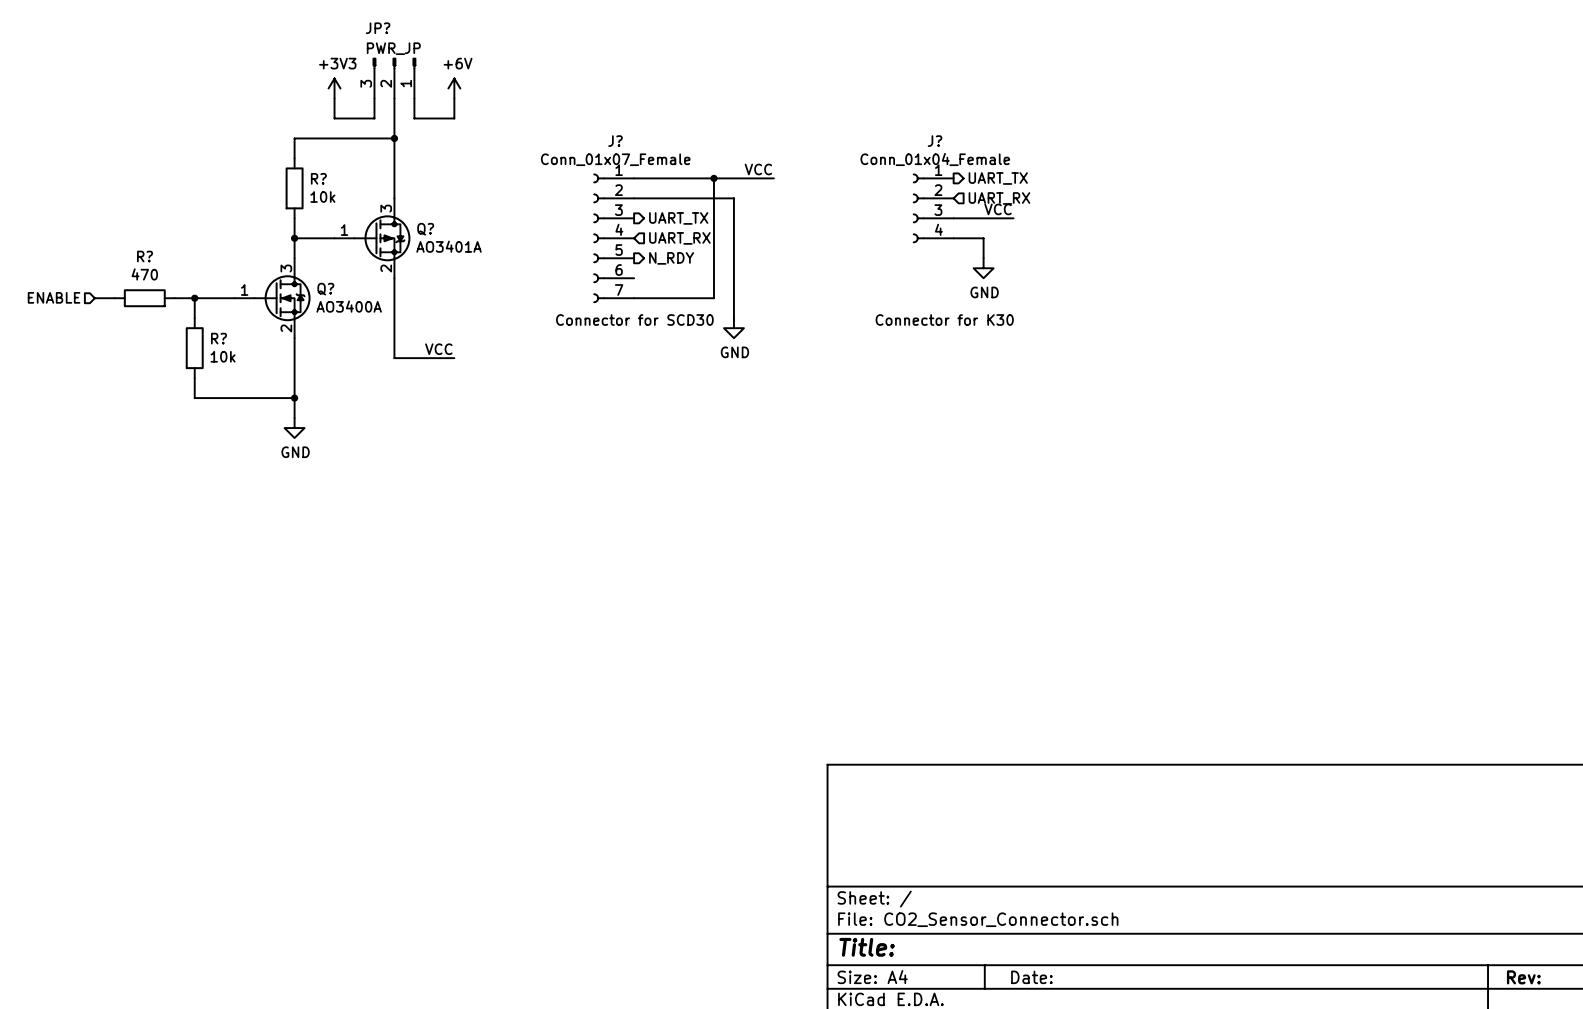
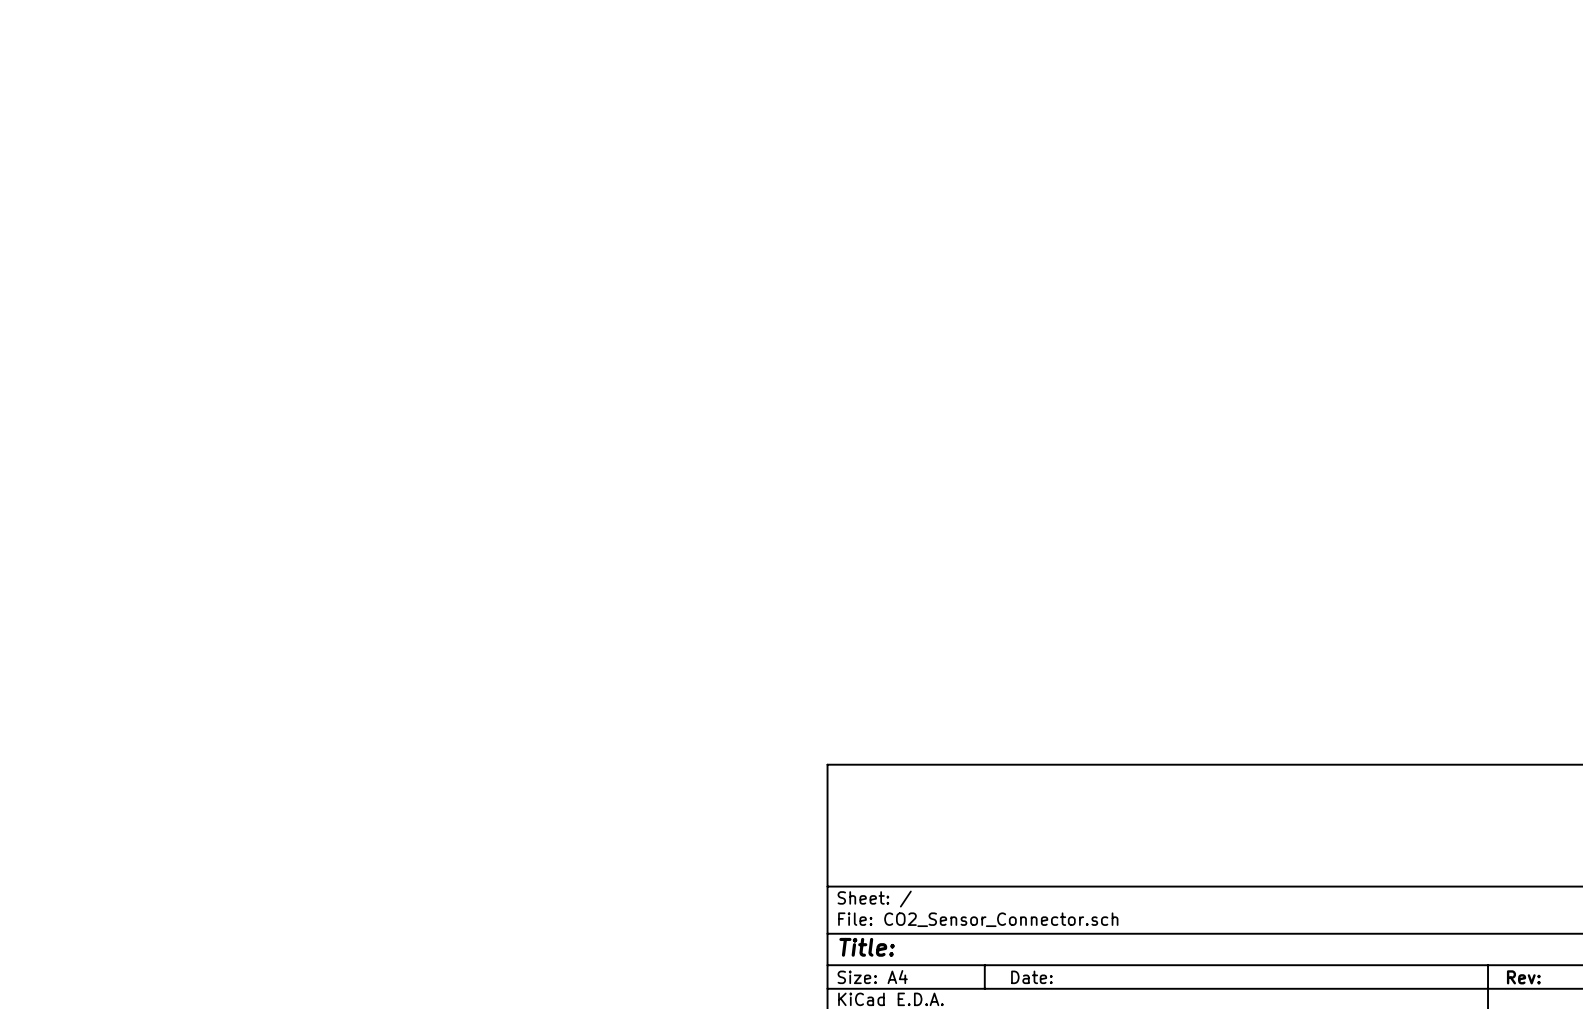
JP?: PWR_JP (394, 78) -> none
power symbol: +3V3 (334, 88) -> none
power symbol: +6V (454, 88) -> none
wire: (334, 98) (334, 118) (374, 118) (374, 98) -> none
wire: (394, 98) (394, 198) -> none
wire: (414, 98) (414, 118) (454, 118) (454, 98) -> none
wire: (394, 138) (294, 138) (294, 158) -> none
junction: (394, 138) -> none
label: VCC (758, 169) -> none
wire: (634, 178) (773, 178) -> none
wire: (713, 178) (713, 298) (634, 298) -> none
junction: (713, 178) -> none
hierarchical label: UART_TX (998, 178) -> none
R?: 10k (294, 188) -> none
wire: (634, 198) (733, 198) (733, 318) -> none
hierarchical label: UART_RX (999, 198) -> none
J?: Conn_01x04_Female (933, 208) -> none
label: VCC (998, 209) -> none
wire: (294, 218) (294, 258) -> none
hierarchical label: UART_TX (678, 218) -> none
wire: (953, 218) (1013, 218) -> none
wire: (294, 238) (334, 238) -> none
junction: (294, 238) -> none
Q?: AO3401A (372, 238) -> none
J?: Conn_01x07_Female (613, 238) -> none
hierarchical label: UART_RX (679, 238) -> none
wire: (953, 238) (983, 238) (983, 258) -> none
hierarchical label: N_RDY (671, 258) -> none
power symbol: GND (983, 268) -> none
wire: (394, 278) (394, 358) (454, 358) -> none
hierarchical label: ENABLE (54, 297) -> none
wire: (94, 298) (114, 298) -> none
R?: 470 (144, 298) -> none
wire: (174, 298) (234, 298) -> none
wire: (194, 298) (194, 318) -> none
junction: (194, 298) -> none
Q?: AO3400A (272, 298) -> none
text: Connector for SCD30 (634, 320) -> none
text: Connector for K30 (944, 320) -> none
power symbol: GND (733, 328) -> none
wire: (294, 338) (294, 418) -> none
R?: 10k (194, 348) -> none
label: VCC (438, 349) -> none
wire: (194, 378) (194, 398) (294, 398) -> none
junction: (294, 398) -> none
power symbol: GND (294, 428) -> none

